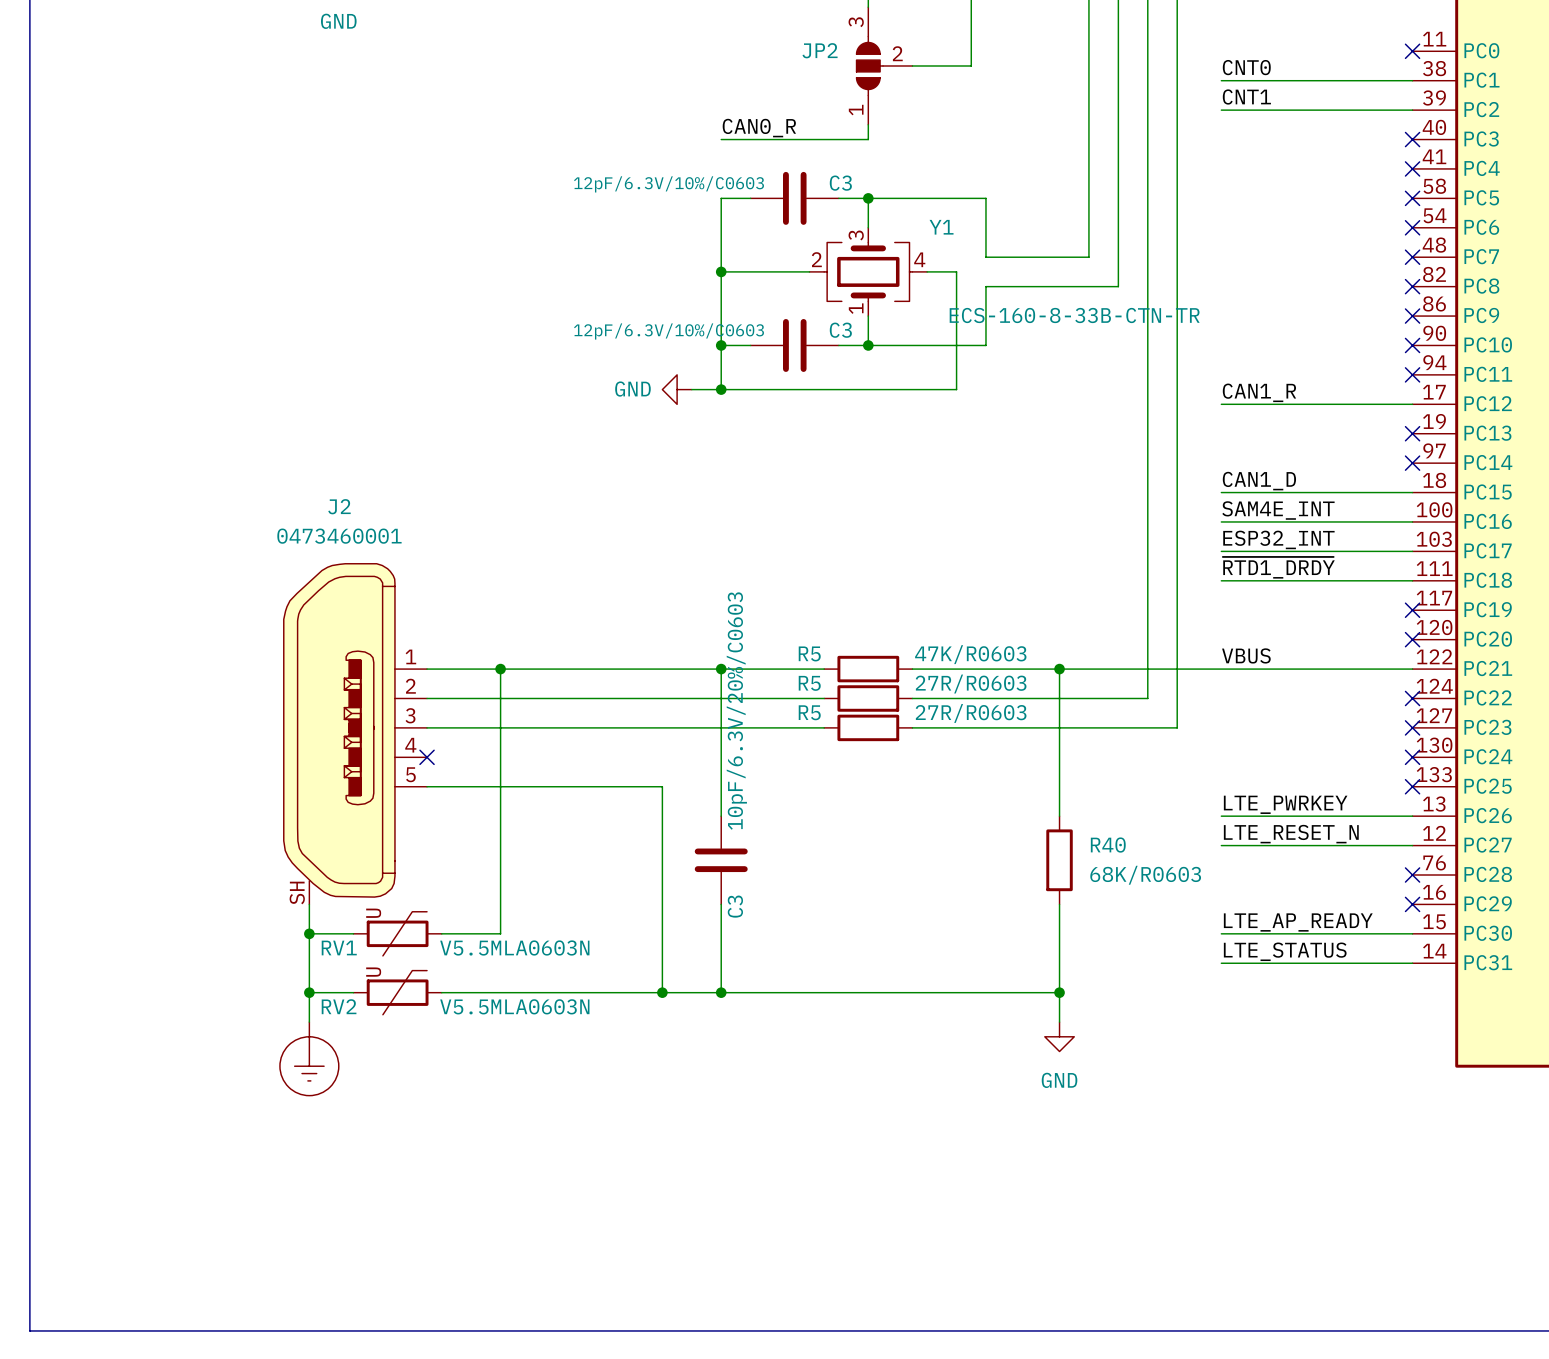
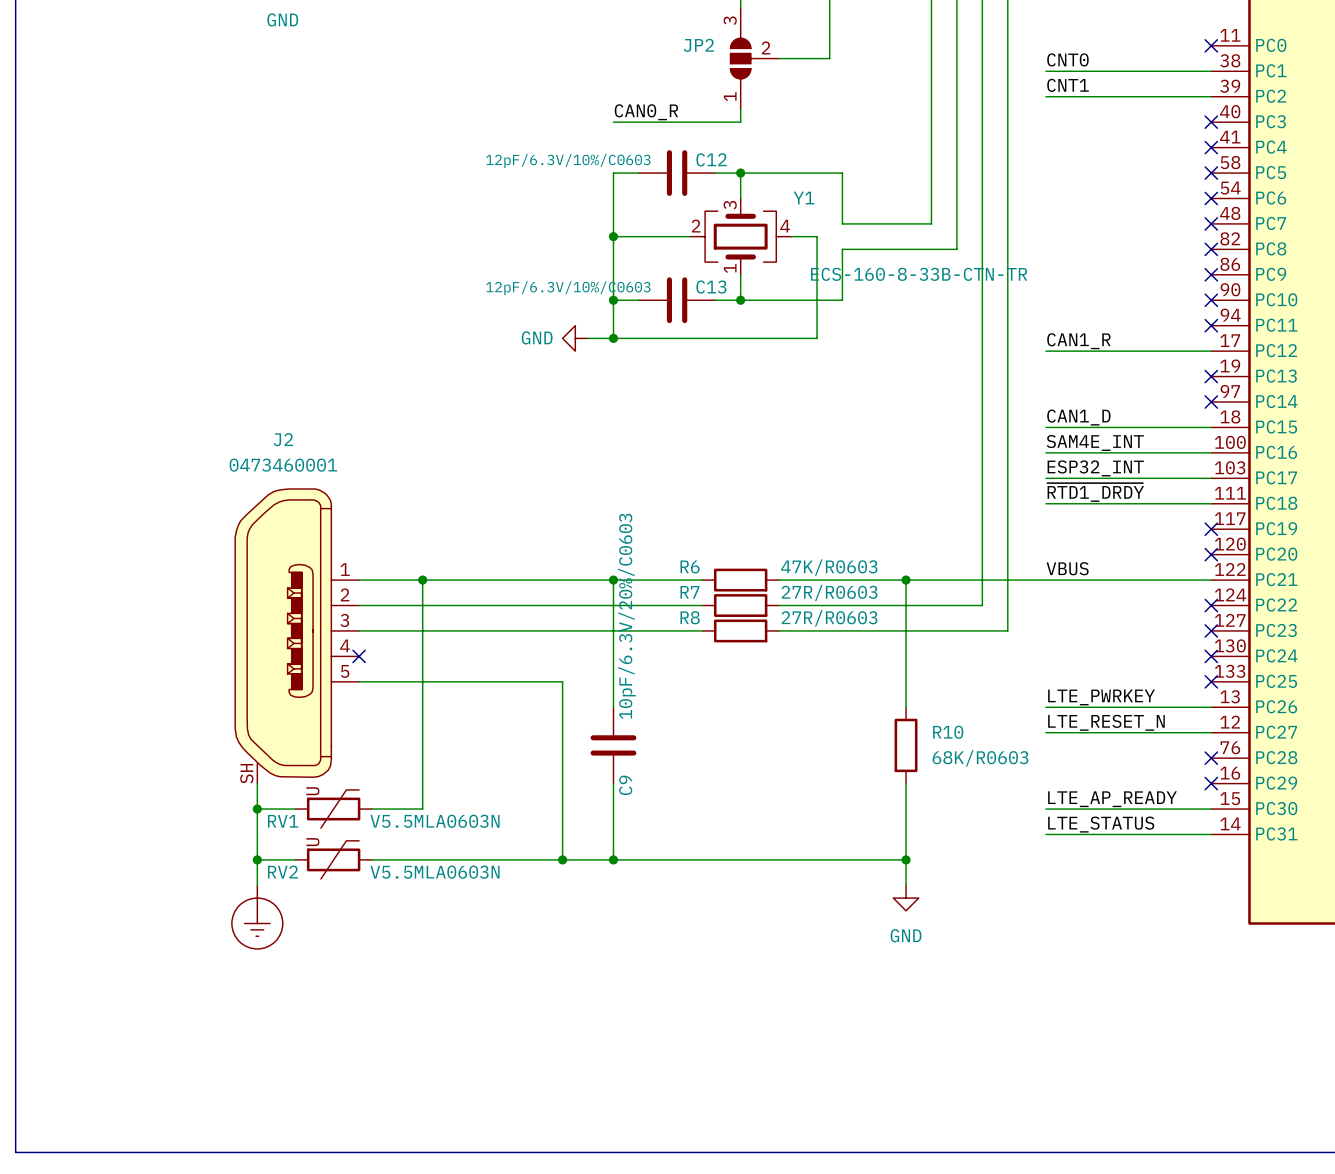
C3 name: C3 (840, 183) -> C12 (711, 159)
C3 name: C3 (840, 330) -> C13 (711, 287)
R5 name: R5 (809, 653) -> R6 (690, 566)
R5 name: R5 (809, 683) -> R7 (689, 592)
R5 name: R5 (809, 712) -> R8 (690, 617)
R40 name: R40 (1108, 845) -> R10 (948, 732)
C3 name: C3 (735, 906) -> C9 (625, 785)

